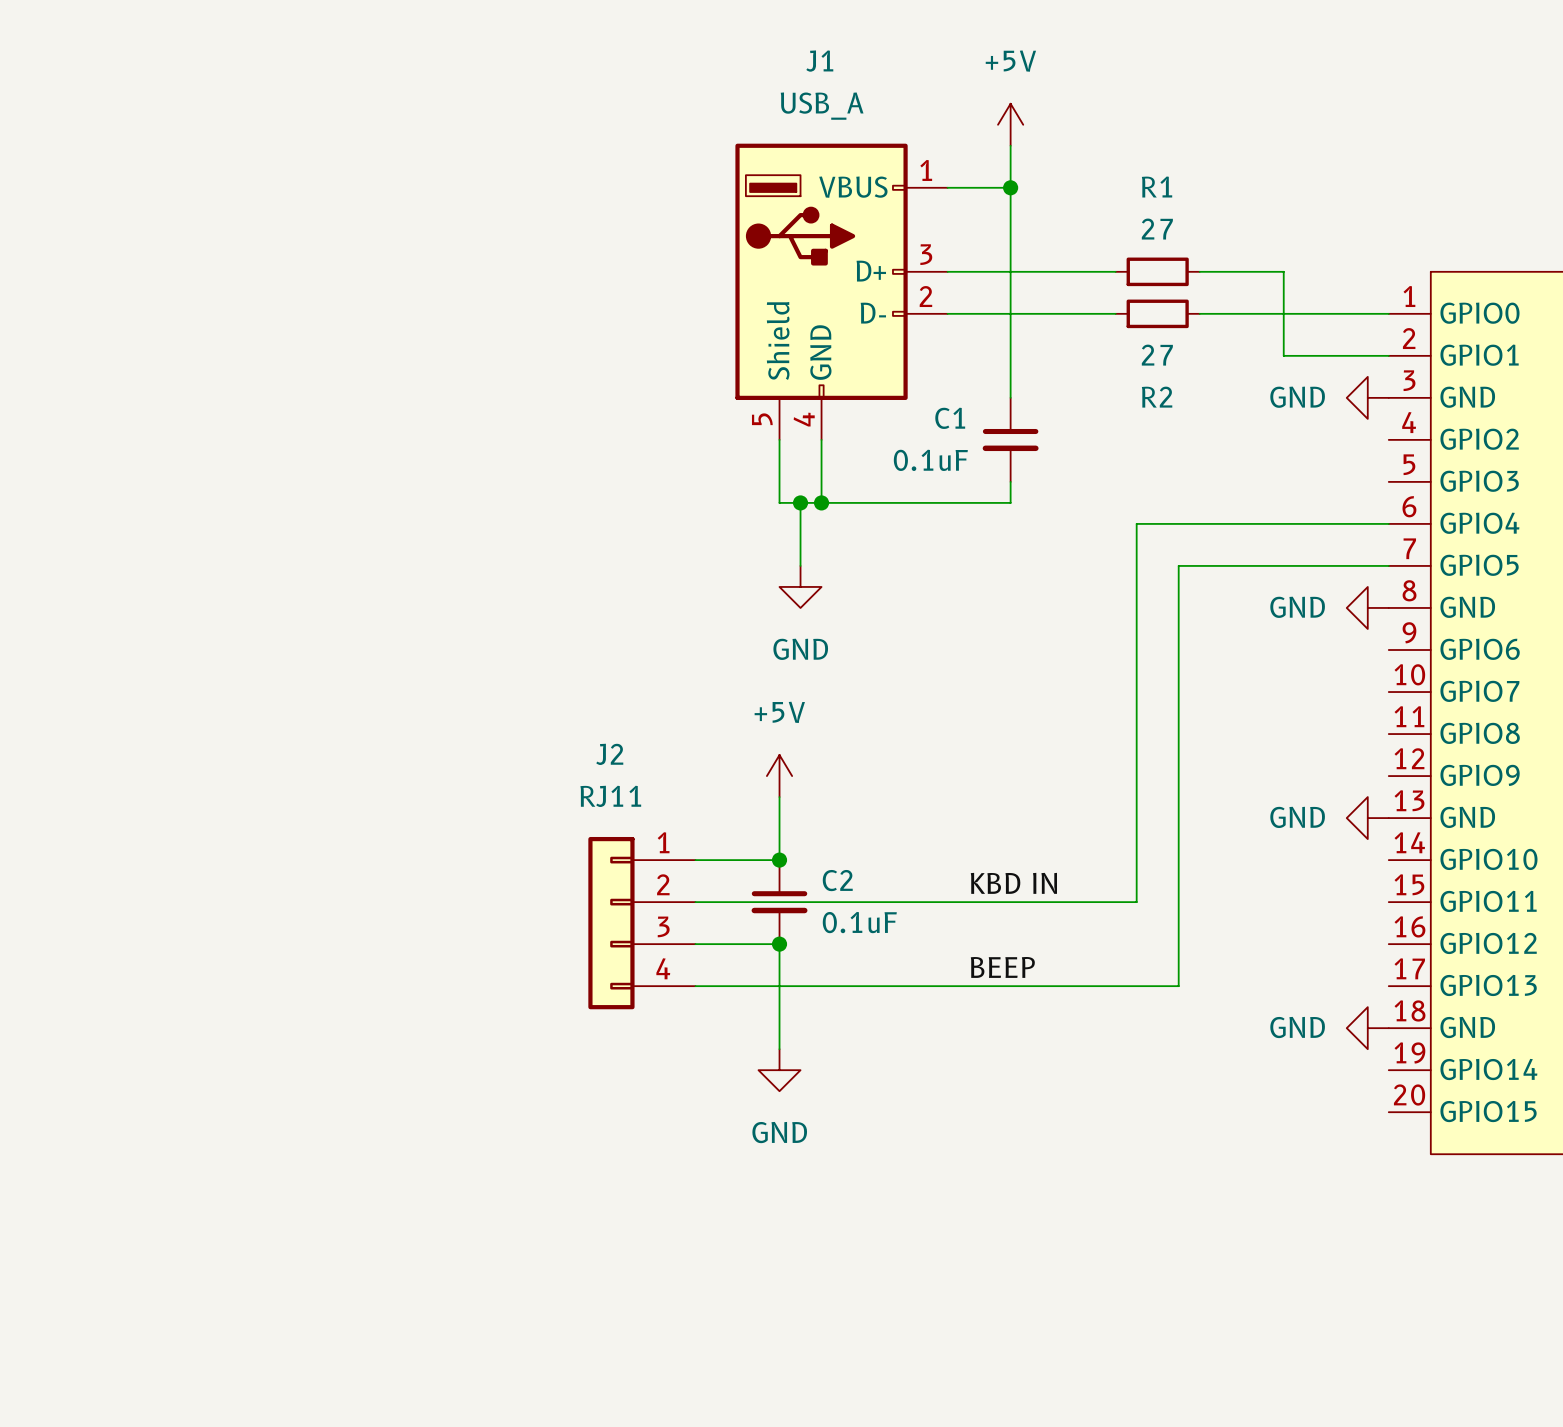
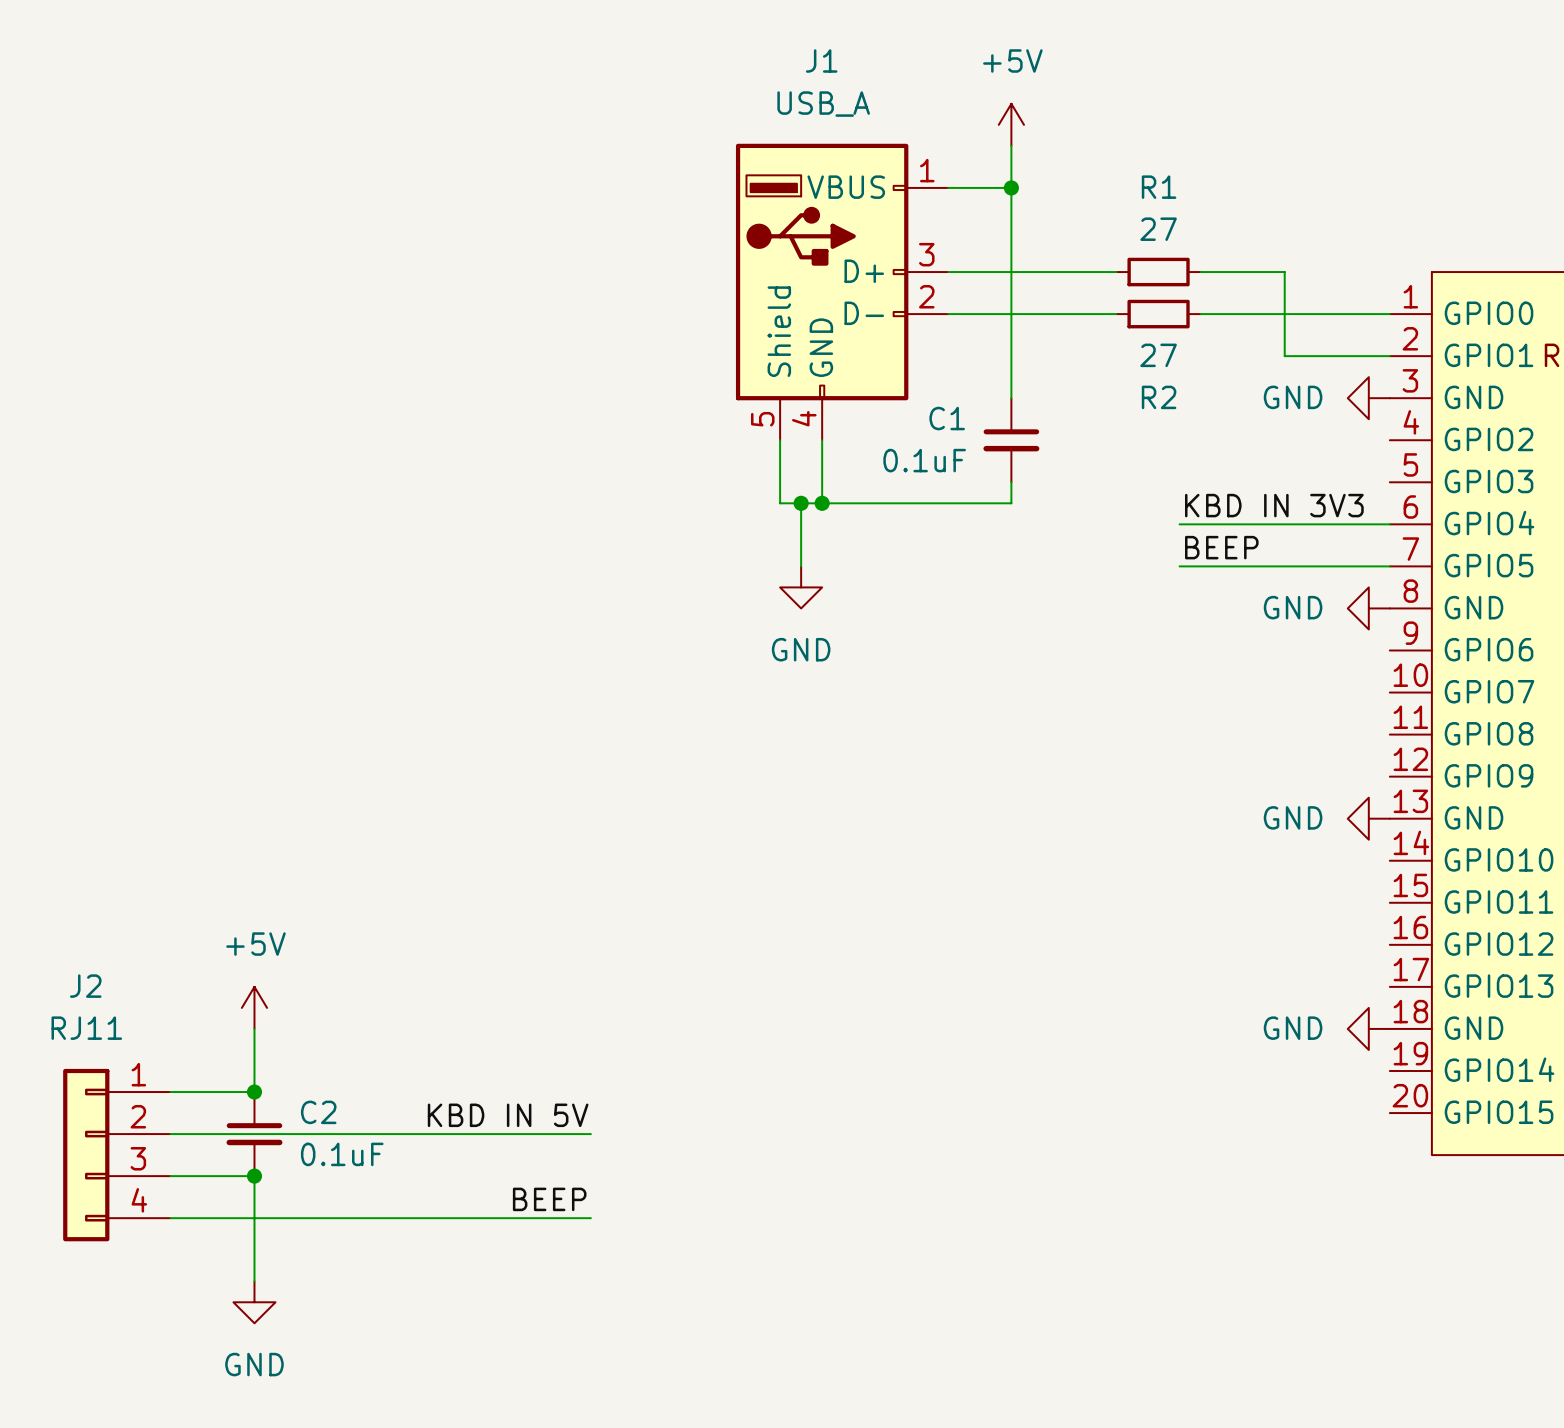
label: none -> KBD IN 3V3 (1274, 505)
wire: (1178, 523) (1136, 523) (1136, 902) (695, 902) -> none
label: none -> BEEP (1221, 547)
wire: (1178, 565) (1178, 986) (695, 986) -> none
power symbol: +5V (779, 776) -> none
wire: (779, 797) (779, 860) (695, 860) -> none
junction: (779, 860) -> none
label: KBD IN (1013, 883) -> none
C2 position: (779, 902) -> (254, 1134)
J2 position: (641, 923) -> (116, 1155)
wire: (695, 944) (779, 944) (779, 1049) -> none
junction: (779, 944) -> none
label: BEEP (1002, 967) -> none
power symbol: none -> +5V (254, 1007)
wire: none -> (254, 1028) (254, 1092) (170, 1092)
power symbol: GND (779, 1070) -> none
junction: none -> (254, 1092)
label: none -> KBD IN 5V (508, 1115)
wire: none -> (170, 1134) (590, 1134)
wire: none -> (170, 1176) (254, 1176) (254, 1281)
junction: none -> (254, 1176)
label: none -> BEEP (549, 1199)
wire: none -> (170, 1218) (590, 1218)
power symbol: none -> GND (254, 1302)

